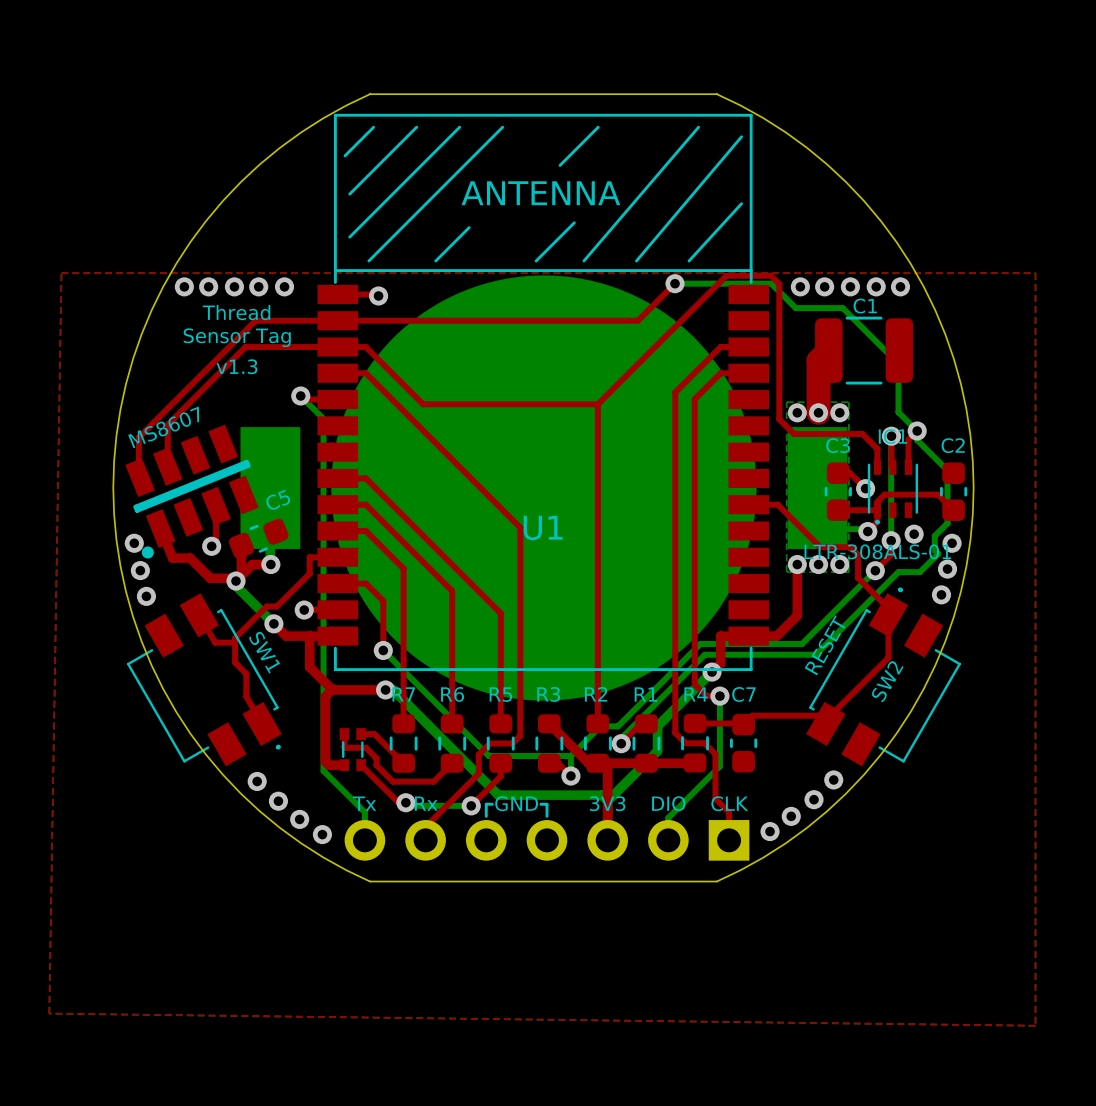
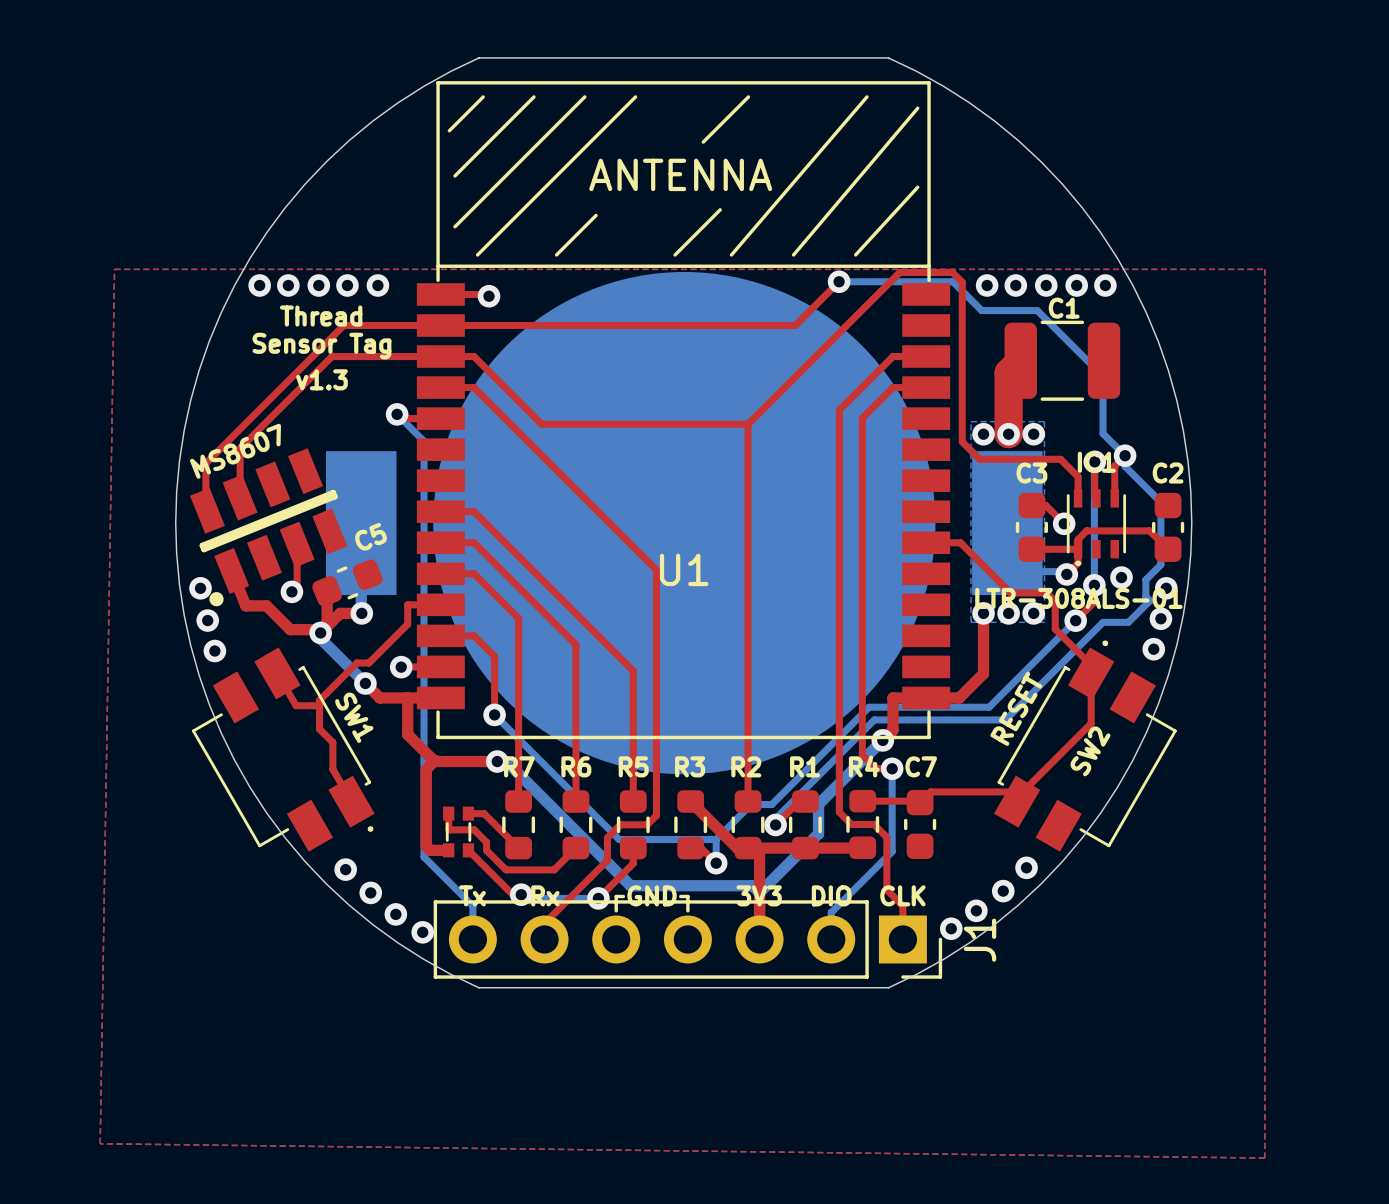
part: (546, 840) -> none
J1: none -> (687, 939)

